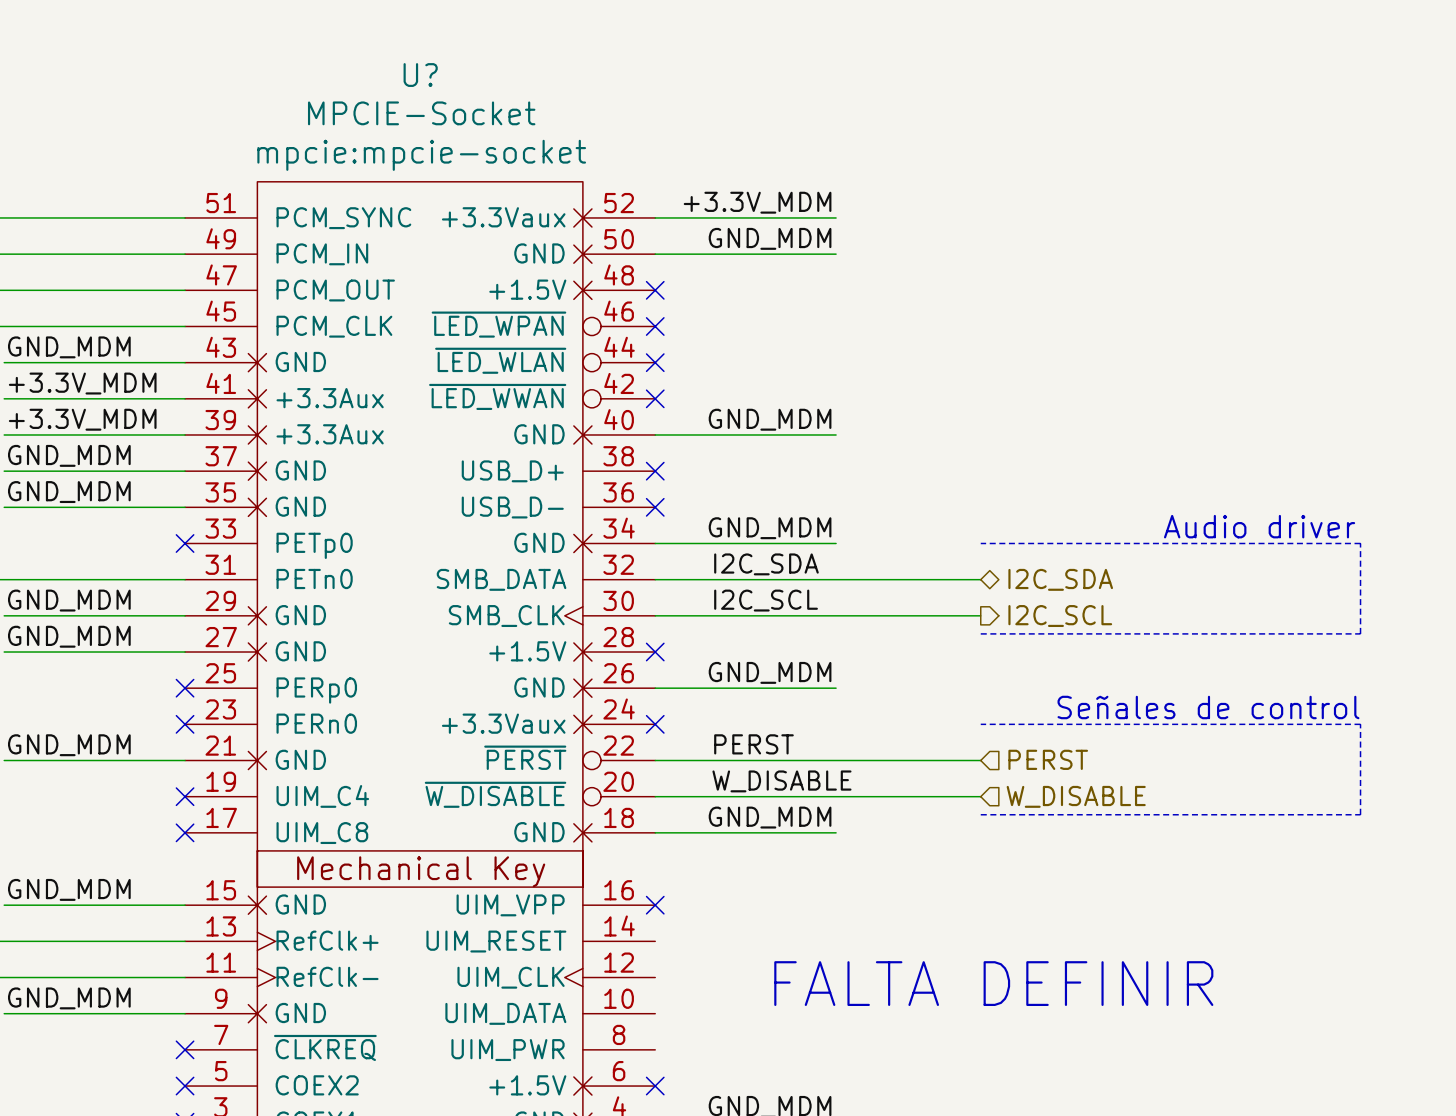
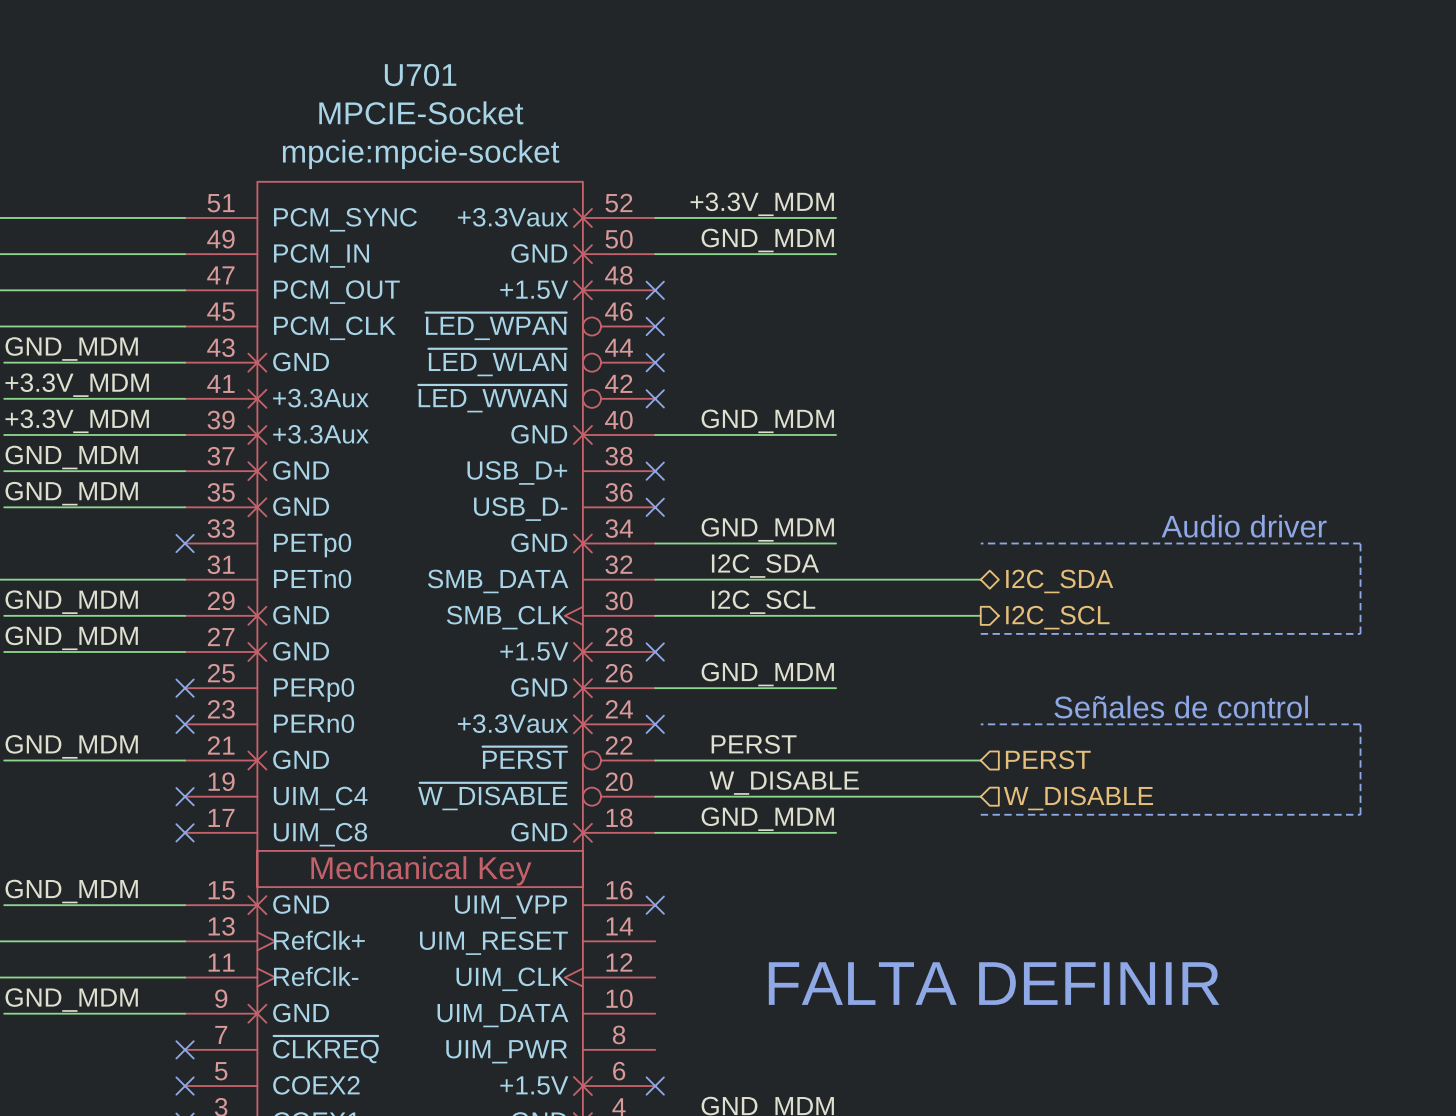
U? name: U? (420, 75) -> U701 (420, 75)

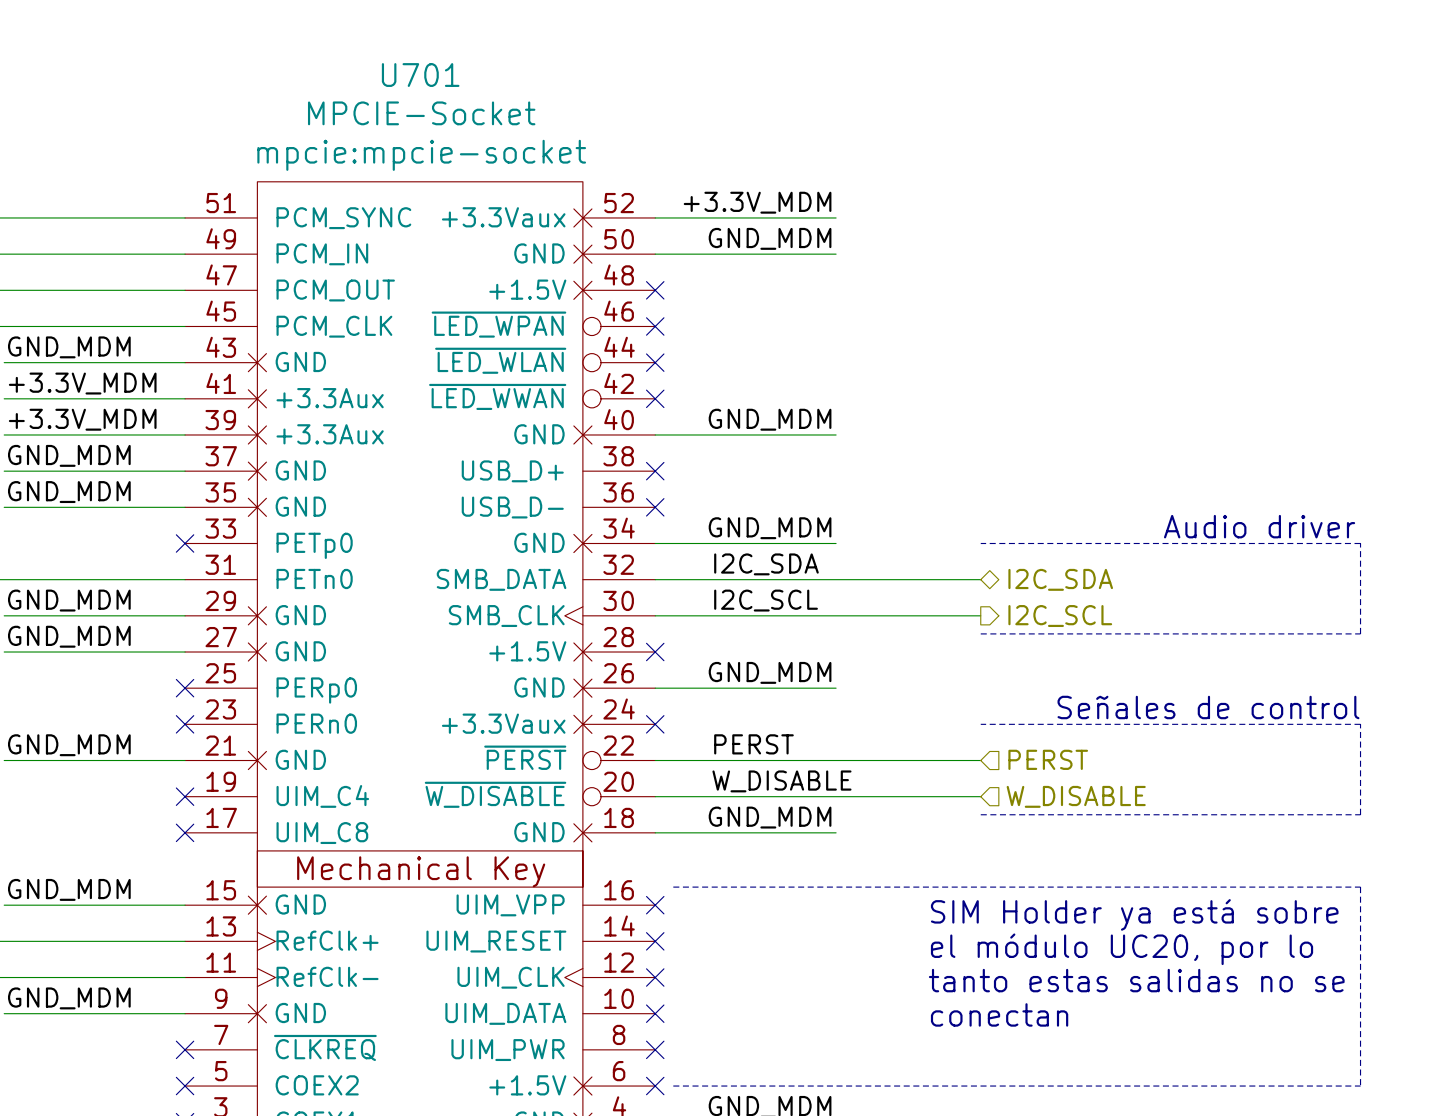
line: none -> (673, 887) (1360, 887) (1360, 1086) (673, 1086)
text: none -> SIM Holder ya está sobre (1134, 914)
no-connect mark: none -> (655, 941)
text: none -> el módulo UC20, por lo (1122, 949)
no-connect mark: none -> (655, 977)
text: none -> tanto estas salidas no se (1136, 980)
text: FALTA DEFINIR (994, 983) -> none
no-connect mark: none -> (655, 1013)
text: none -> conectan (999, 1014)
no-connect mark: none -> (655, 1049)

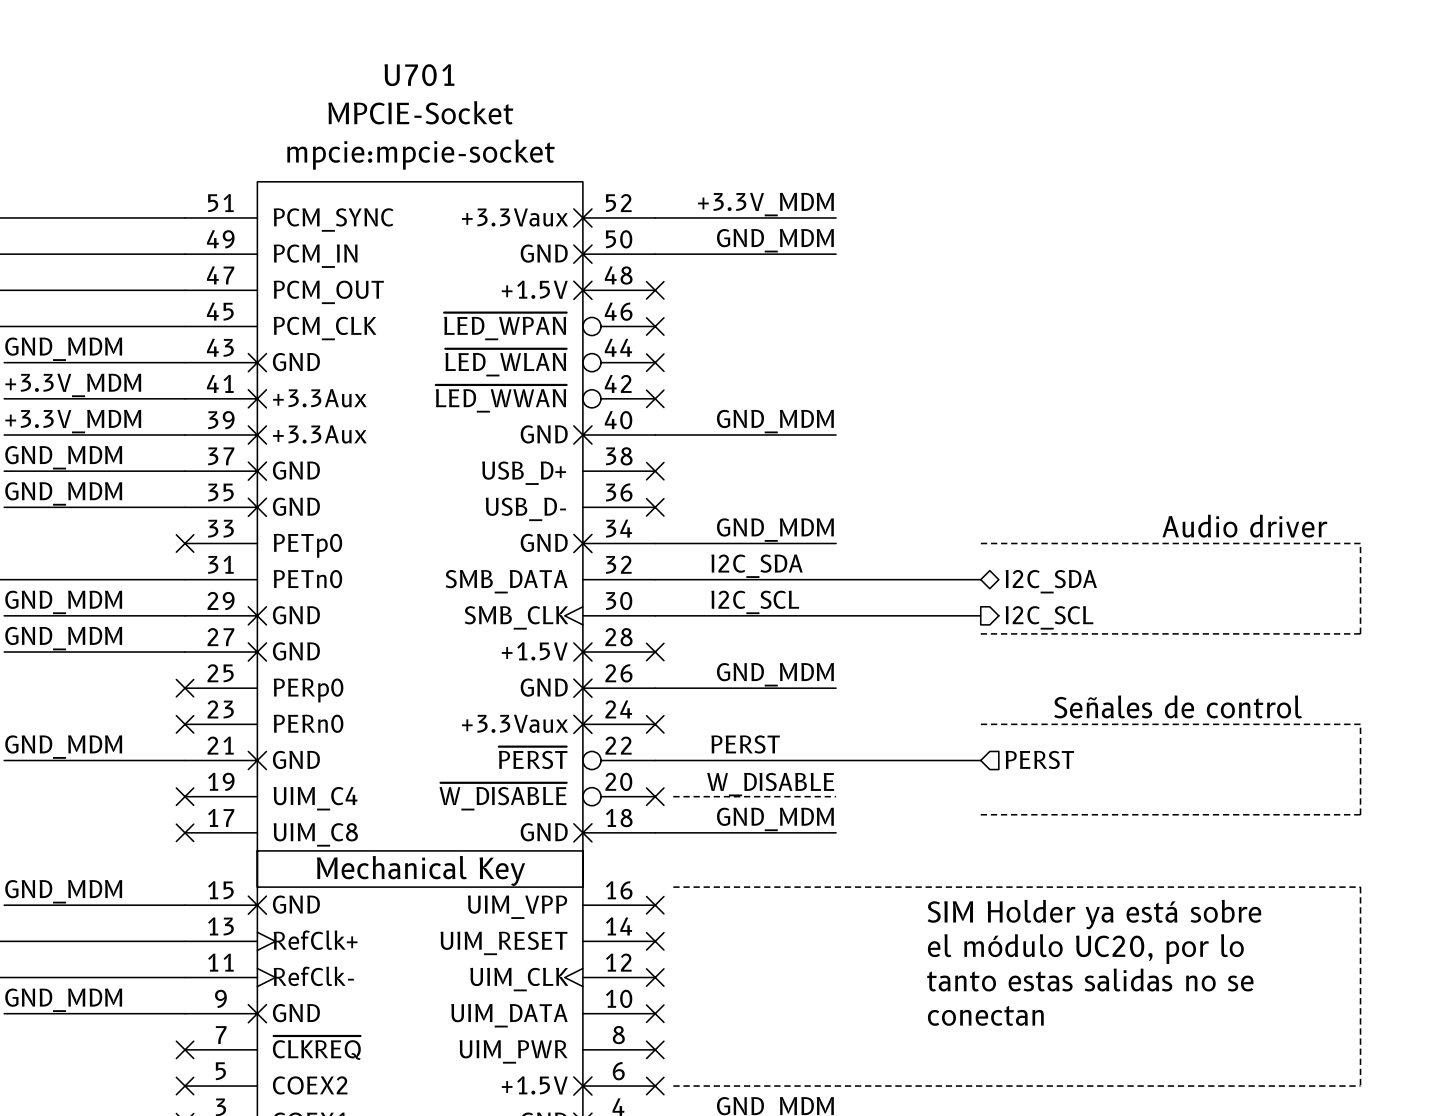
label: W_DISABLE (781, 781) -> none
text: none -> W_DISABLE (770, 784)
wire: (655, 796) (980, 796) -> none
no-connect mark: none -> (655, 796)
line: none -> (673, 796) (836, 796)
hierarchical label: W_DISABLE (1076, 796) -> none

